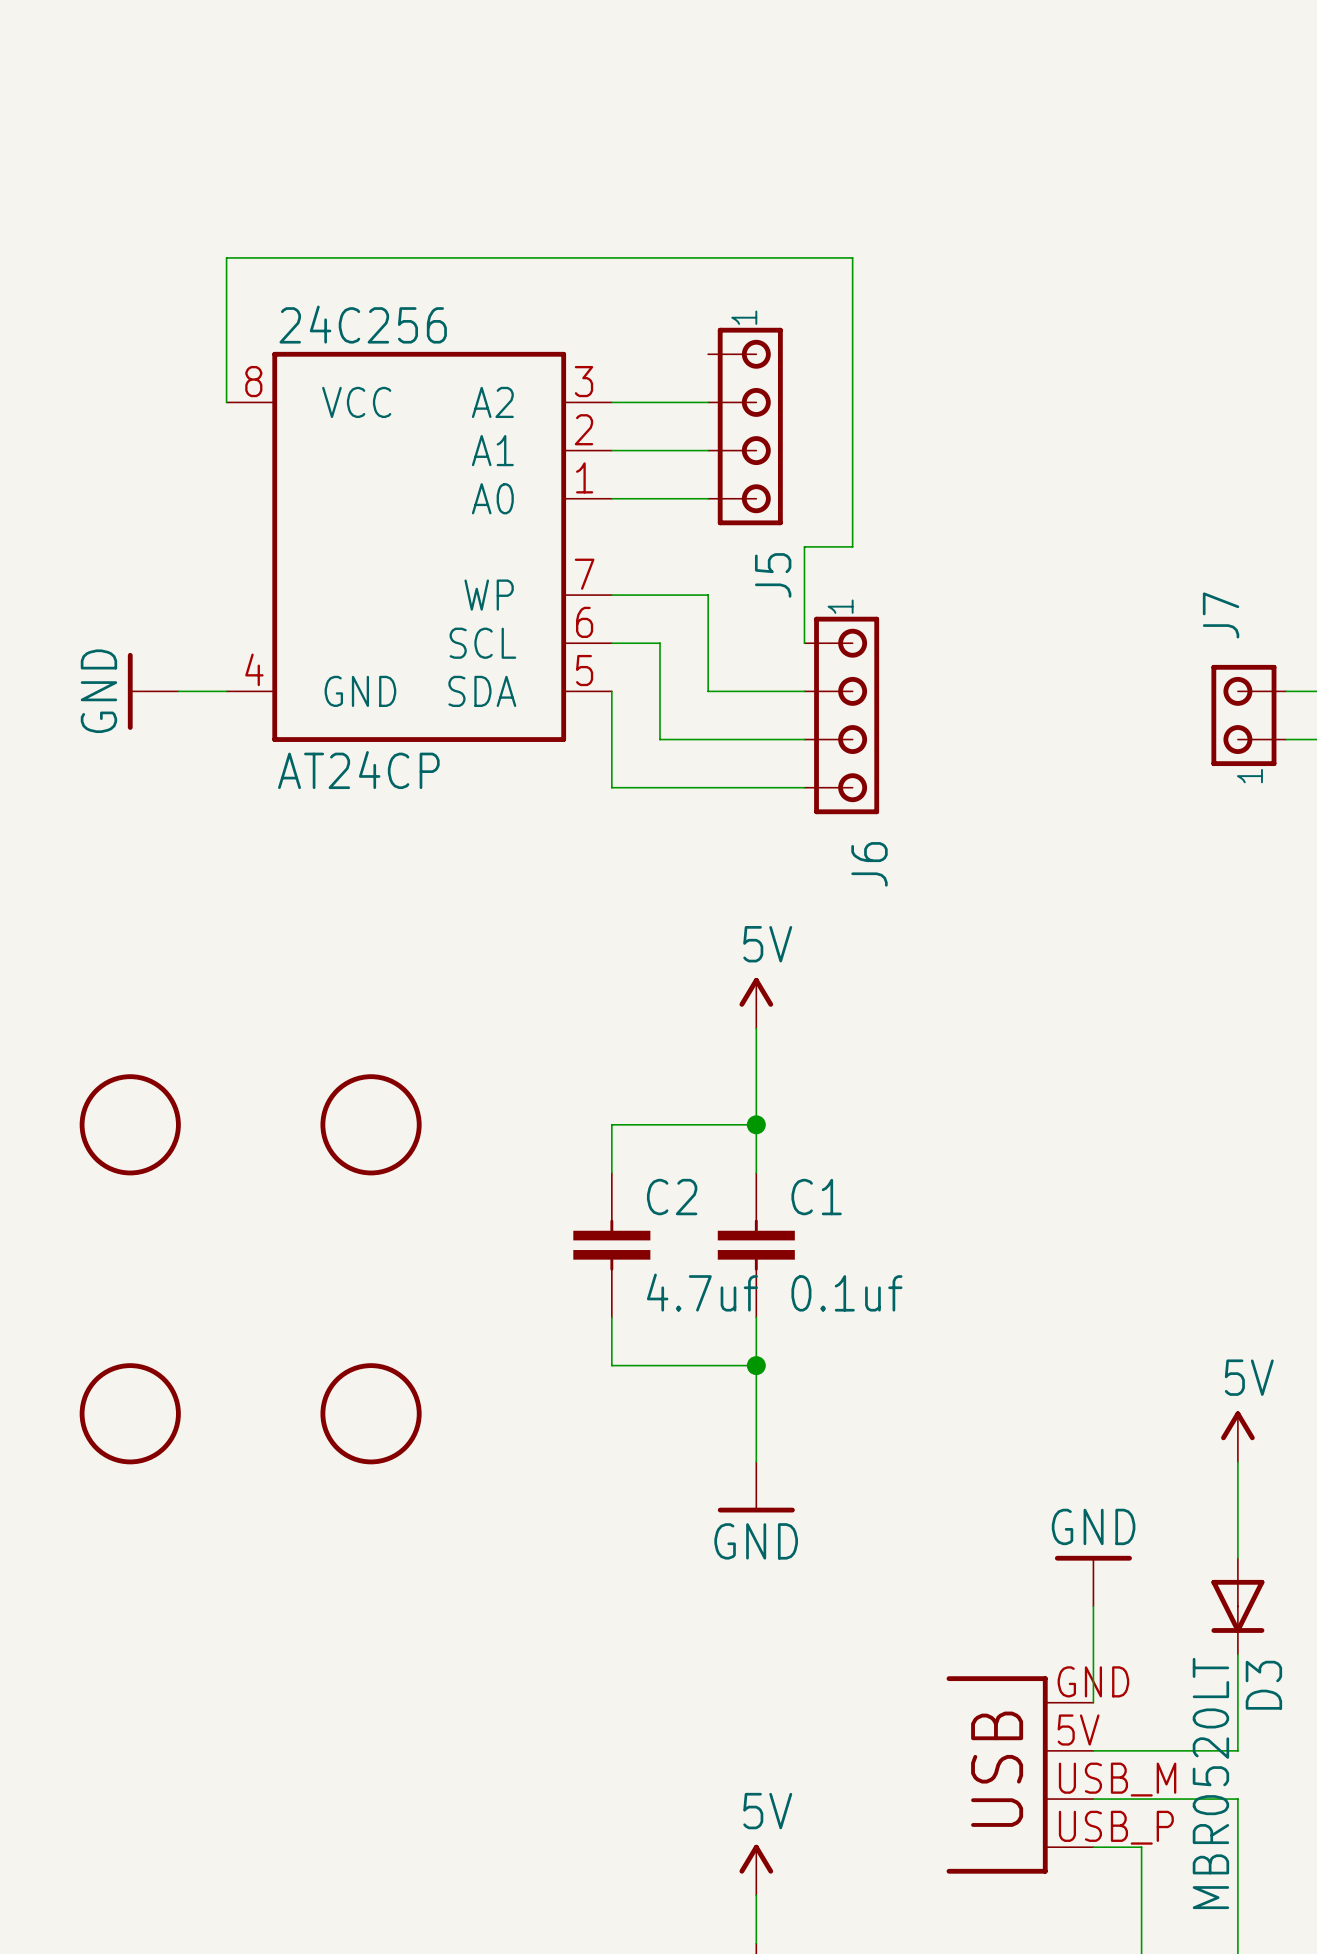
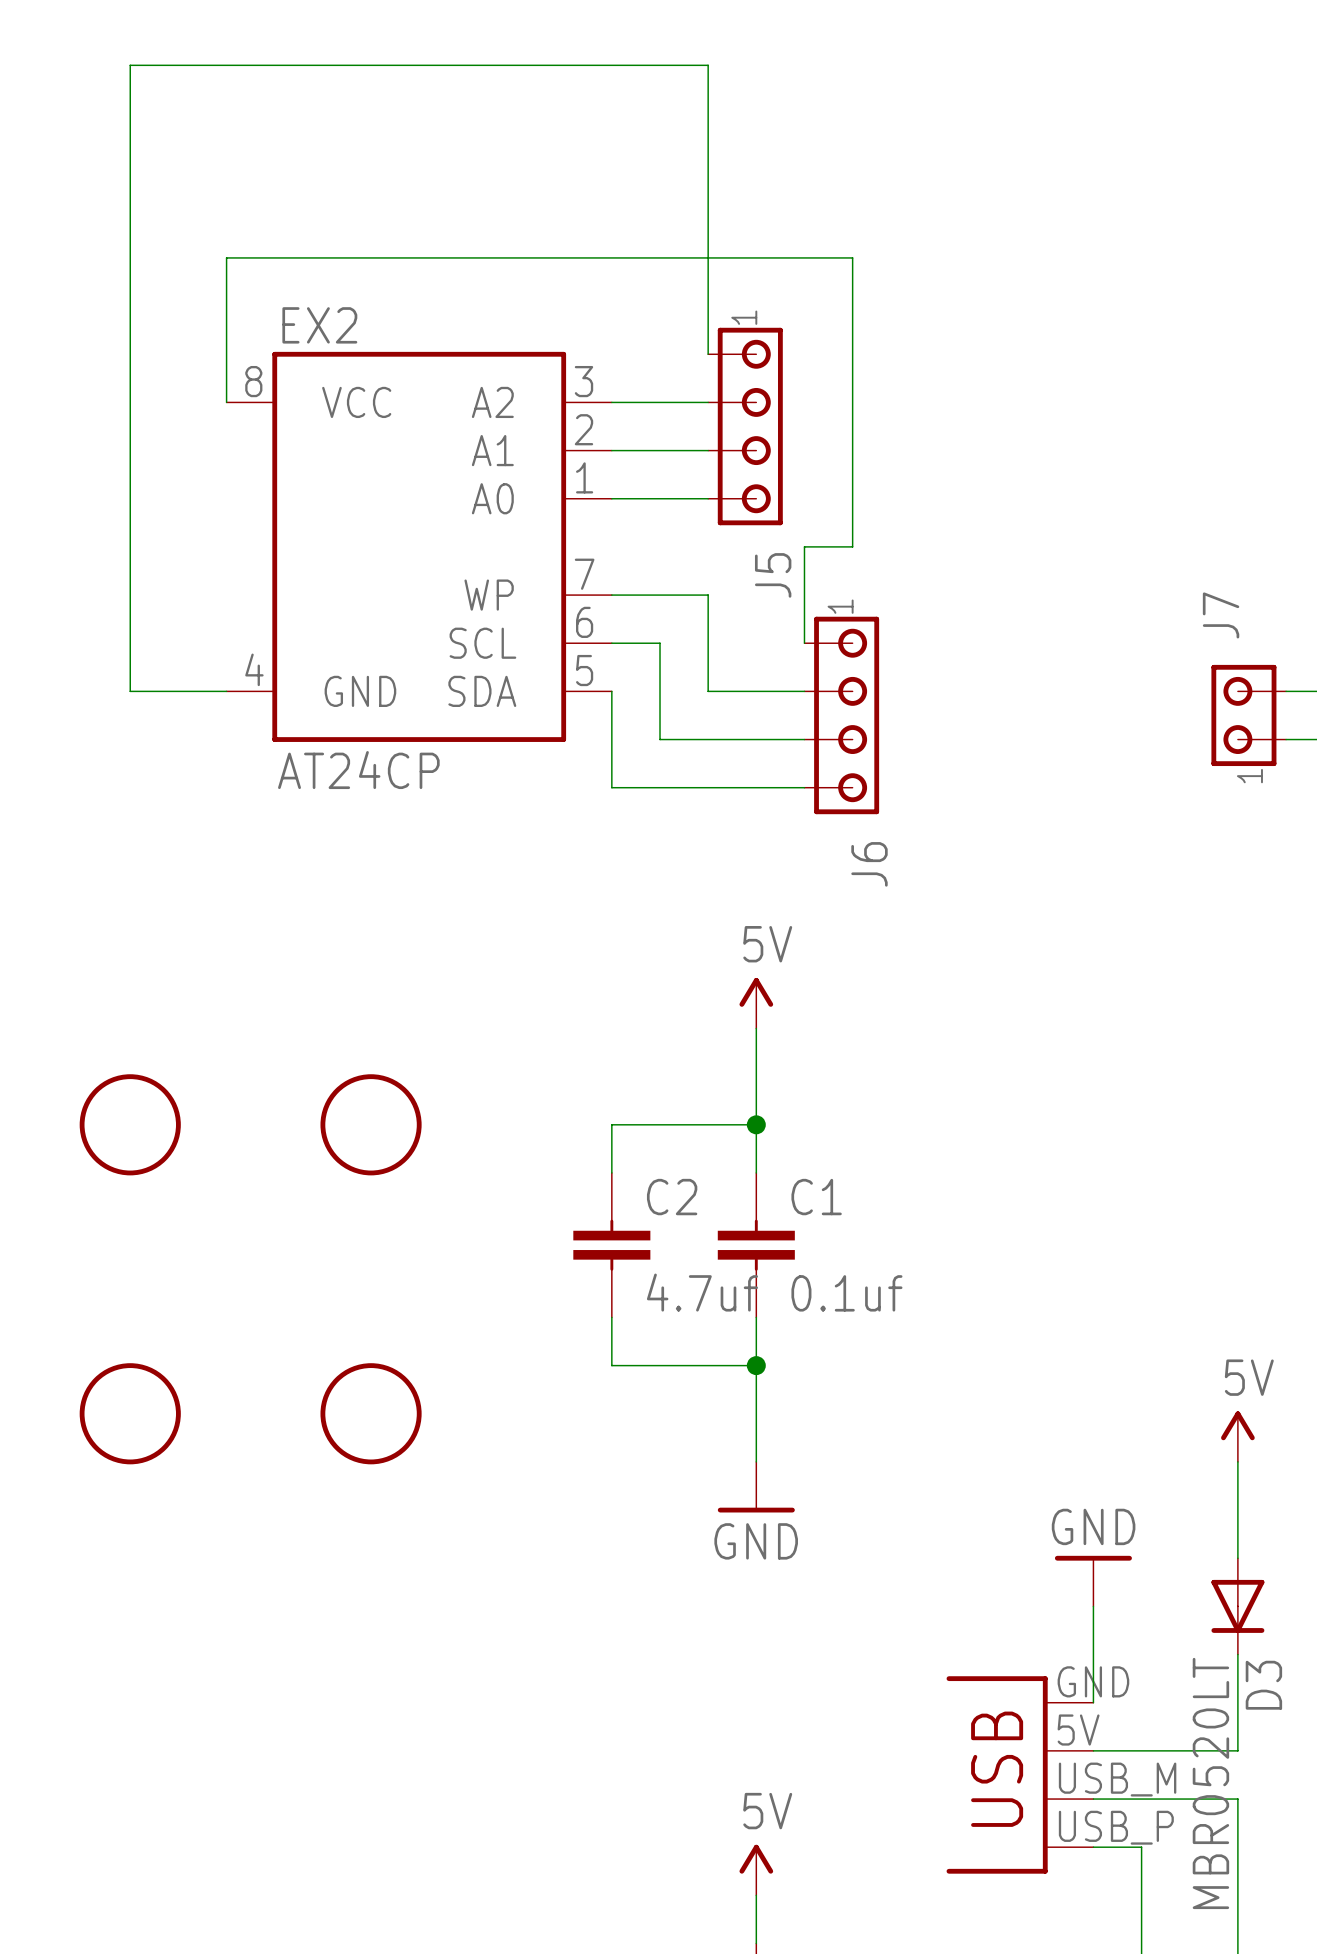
24C256 name: 24C256 (363, 324) -> EX2 (319, 325)
wire: none -> (708, 354) (708, 65) (130, 65) (130, 691) (178, 691)
power symbol: GND (153, 691) -> none

